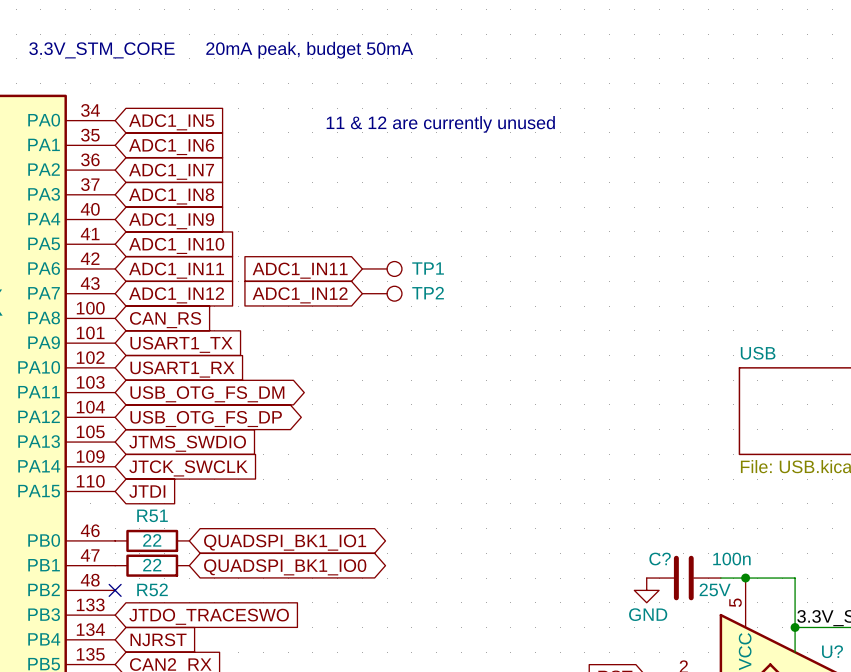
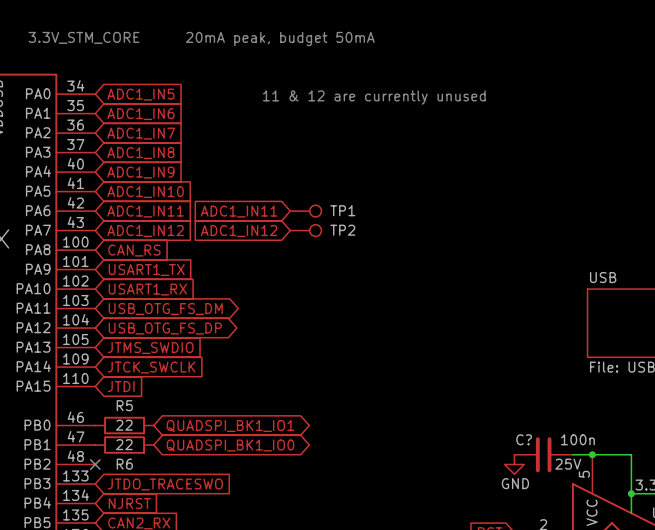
R51 name: R51 (152, 515) -> R5 (124, 405)
R52 name: R52 (152, 589) -> R6 (124, 464)

